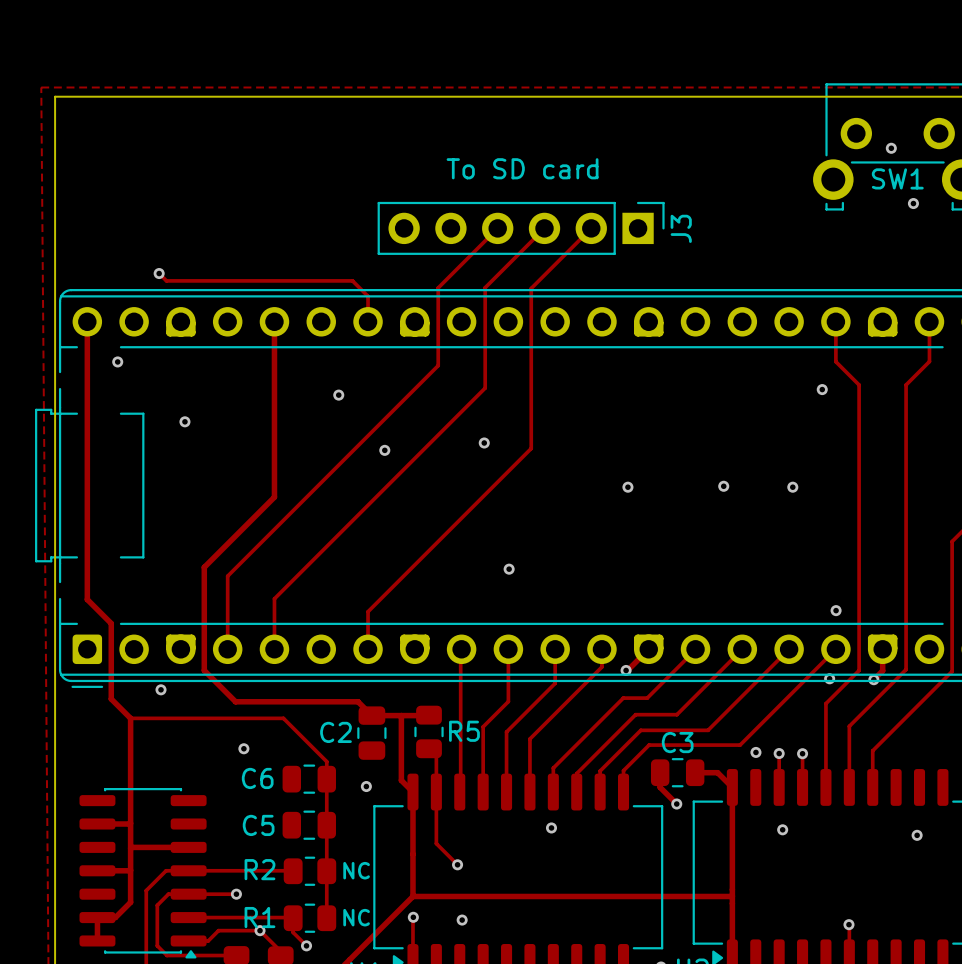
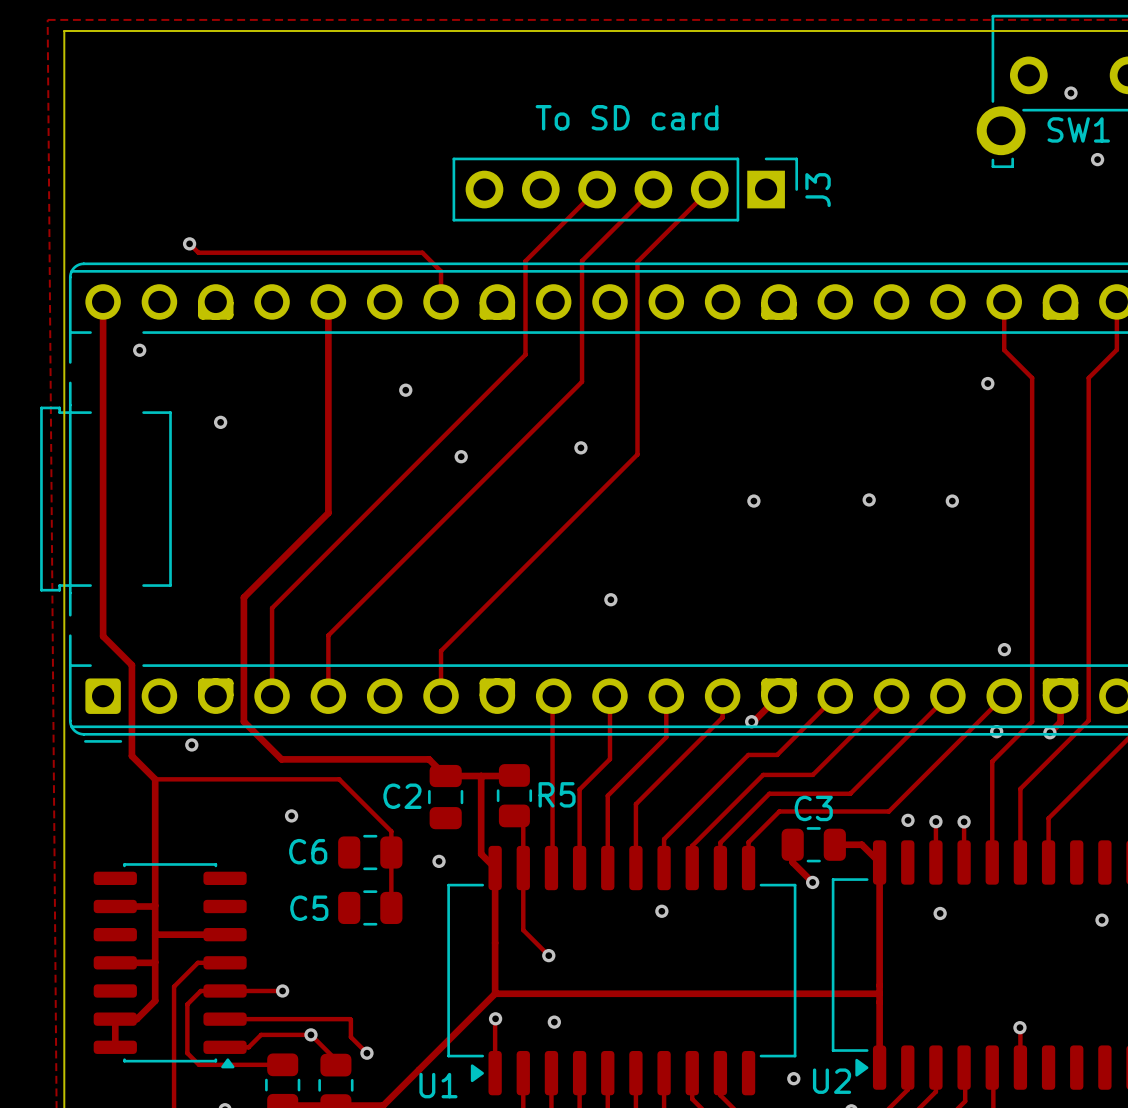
track: (326, 825) (326, 918) -> none
track: (188, 870) (293, 871) -> none
R2: NC (309, 871) -> none
R1: NC (309, 918) -> none

